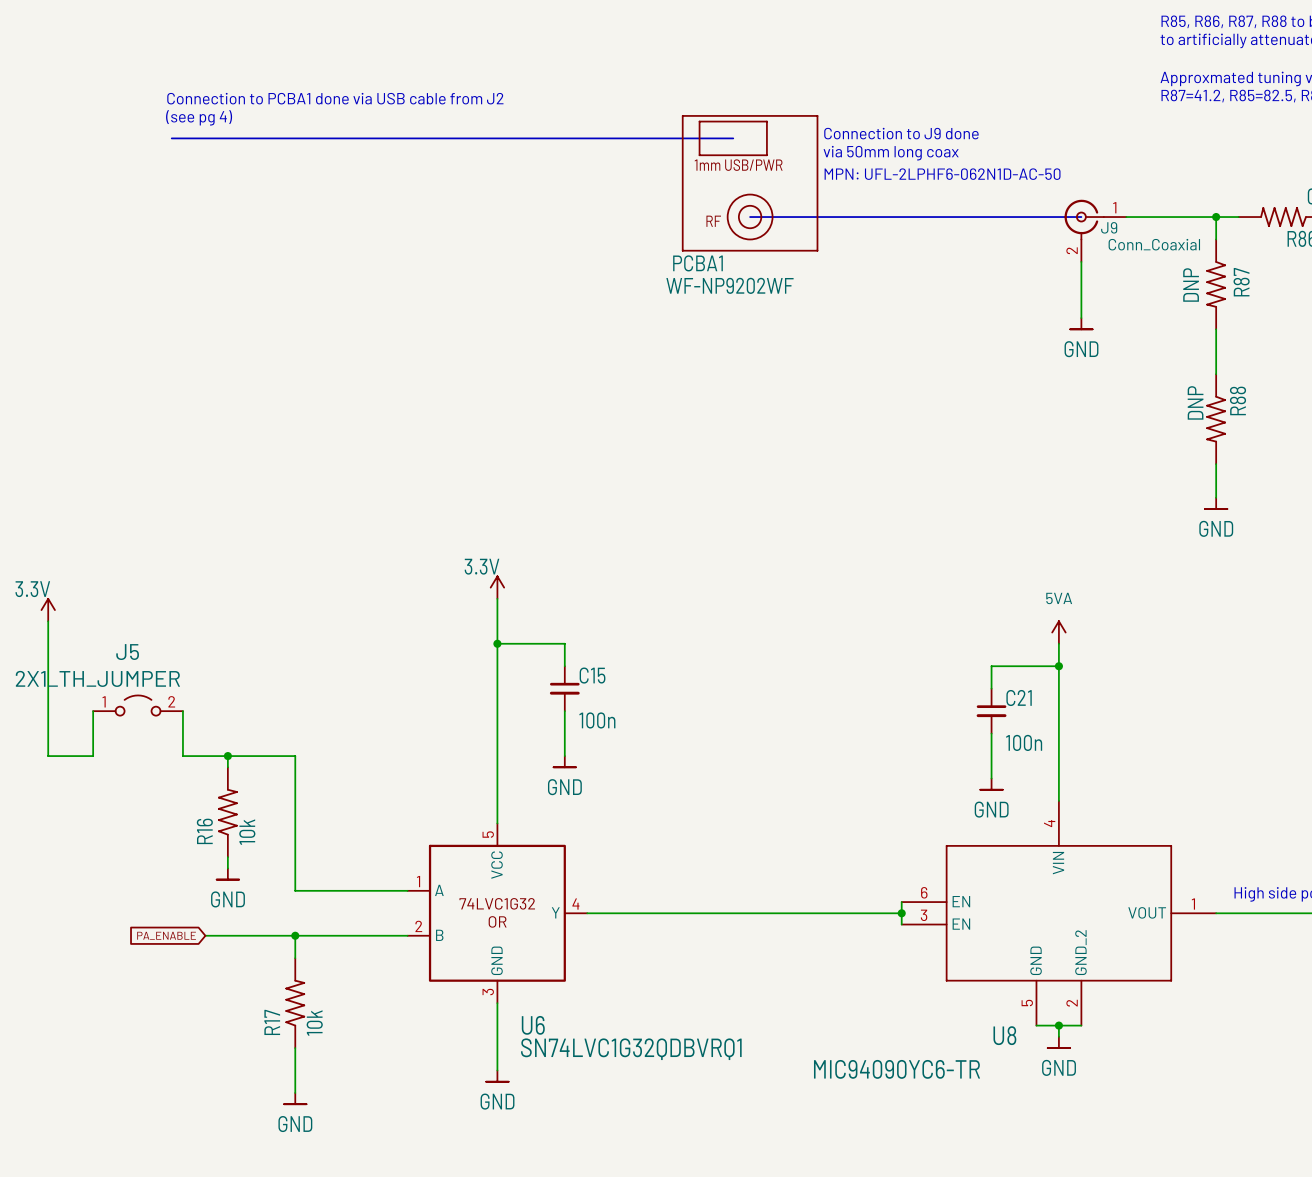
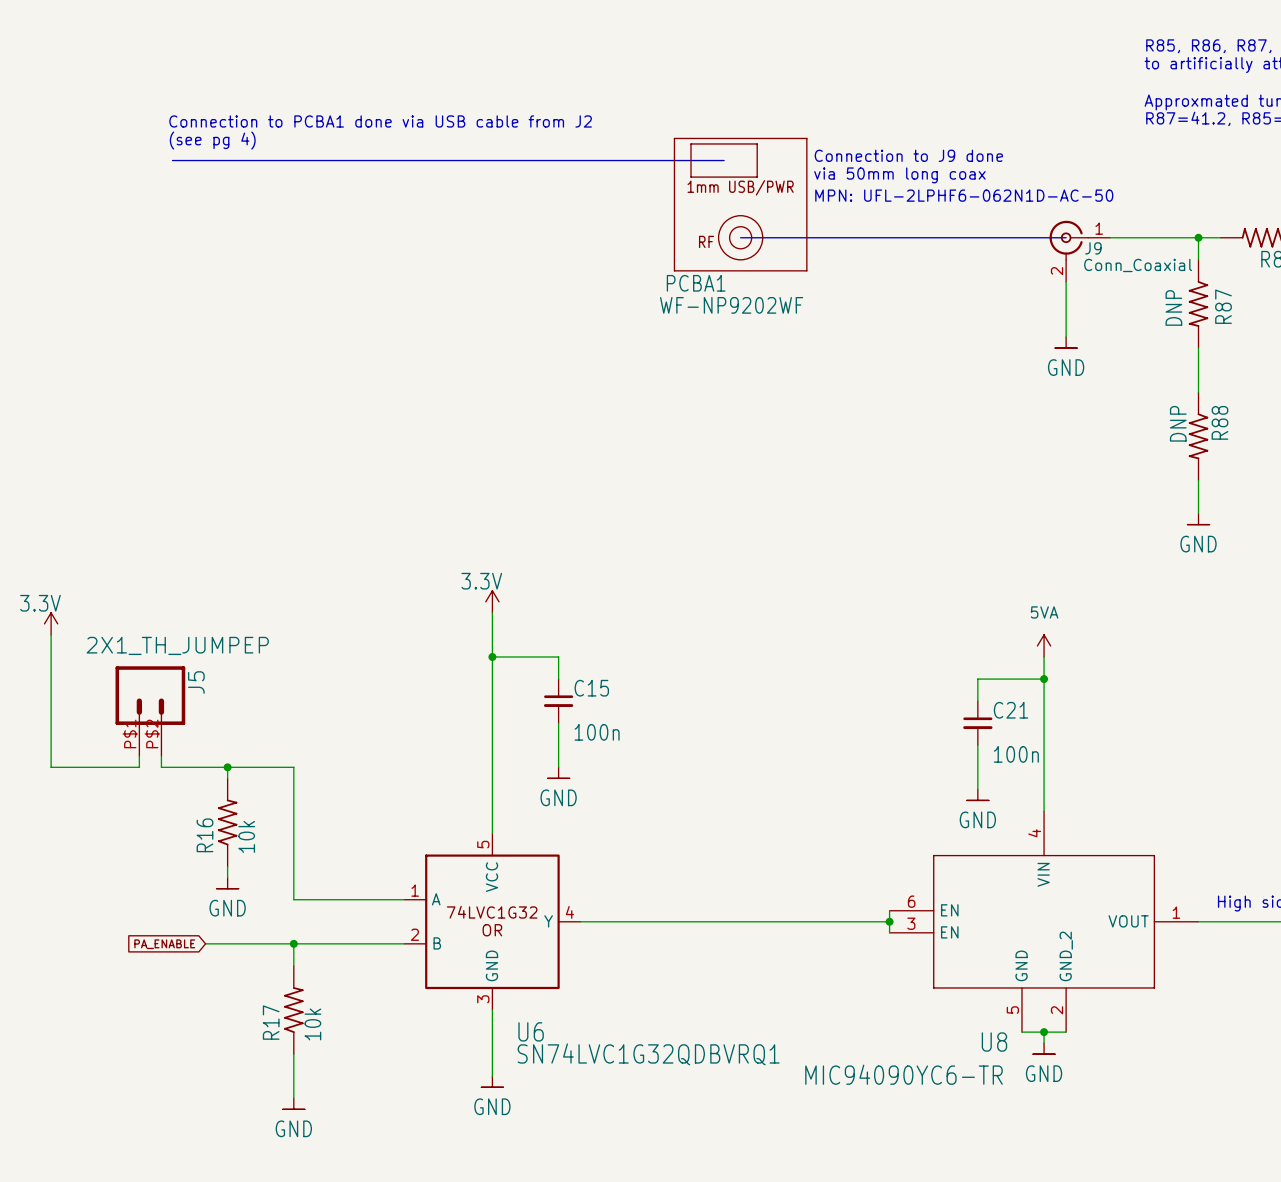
J5 name position: J5 (127, 652) -> J5 (196, 682)
J5 value: 2X1_TH_JUMPER (97, 678) -> 2X1_TH_JUMPEP (177, 645)
J5 symbol: [93, 695, 183, 716] -> [115, 666, 186, 757]
wire: (93, 711) (93, 756) -> (139, 756) (139, 767) (95, 767)
wire: (182, 711) (182, 756) -> (161, 756) (161, 767) (183, 767)

